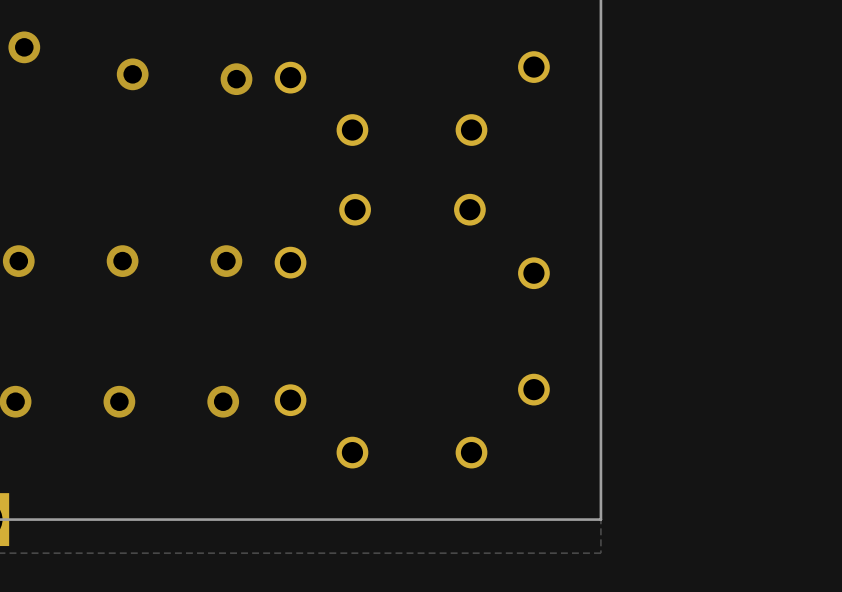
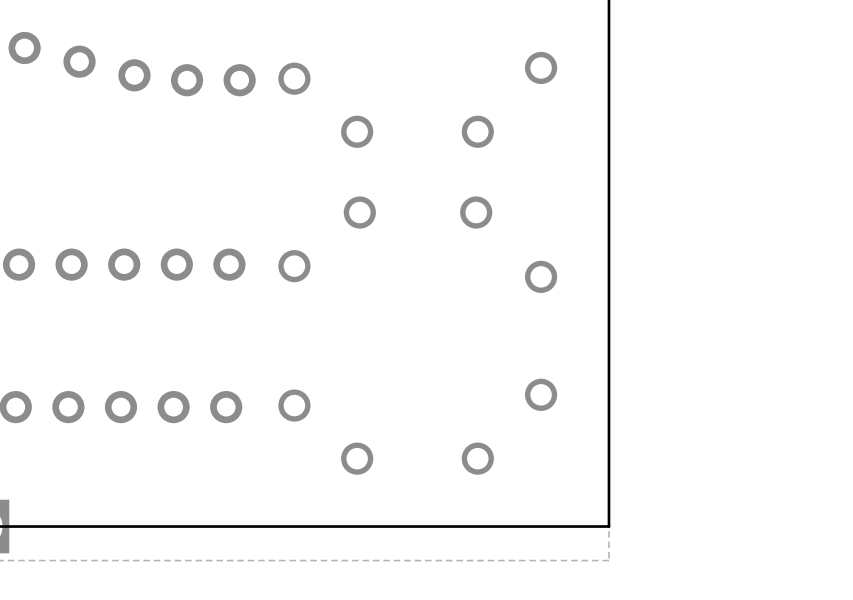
via: none -> (79, 61)
via: none -> (187, 80)
via: none -> (71, 264)
via: none -> (176, 264)
via: none -> (68, 407)
via: none -> (173, 407)

